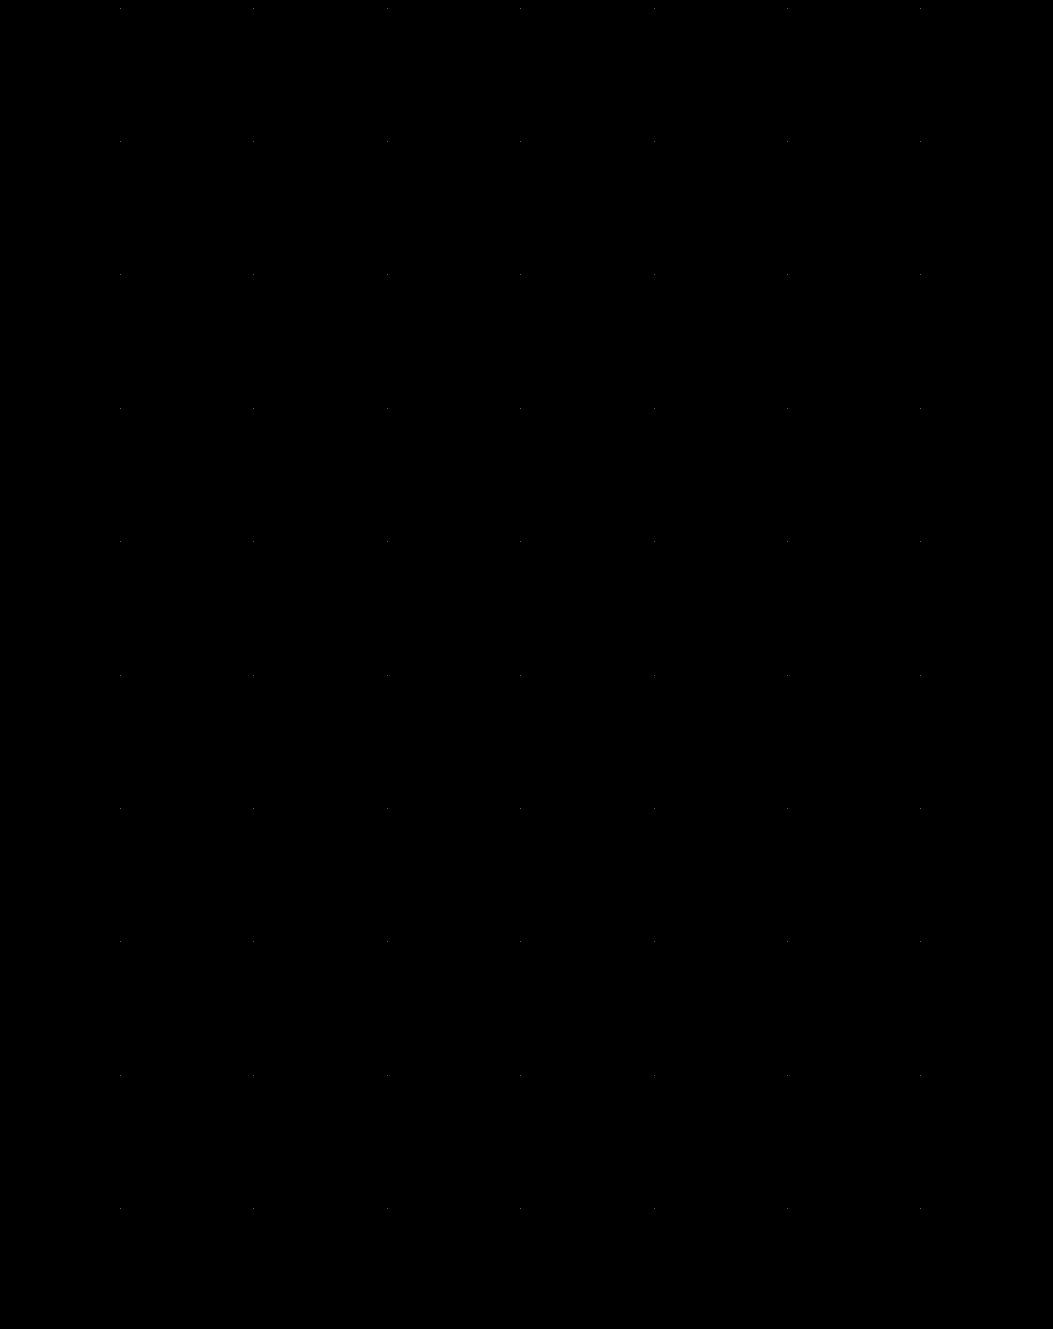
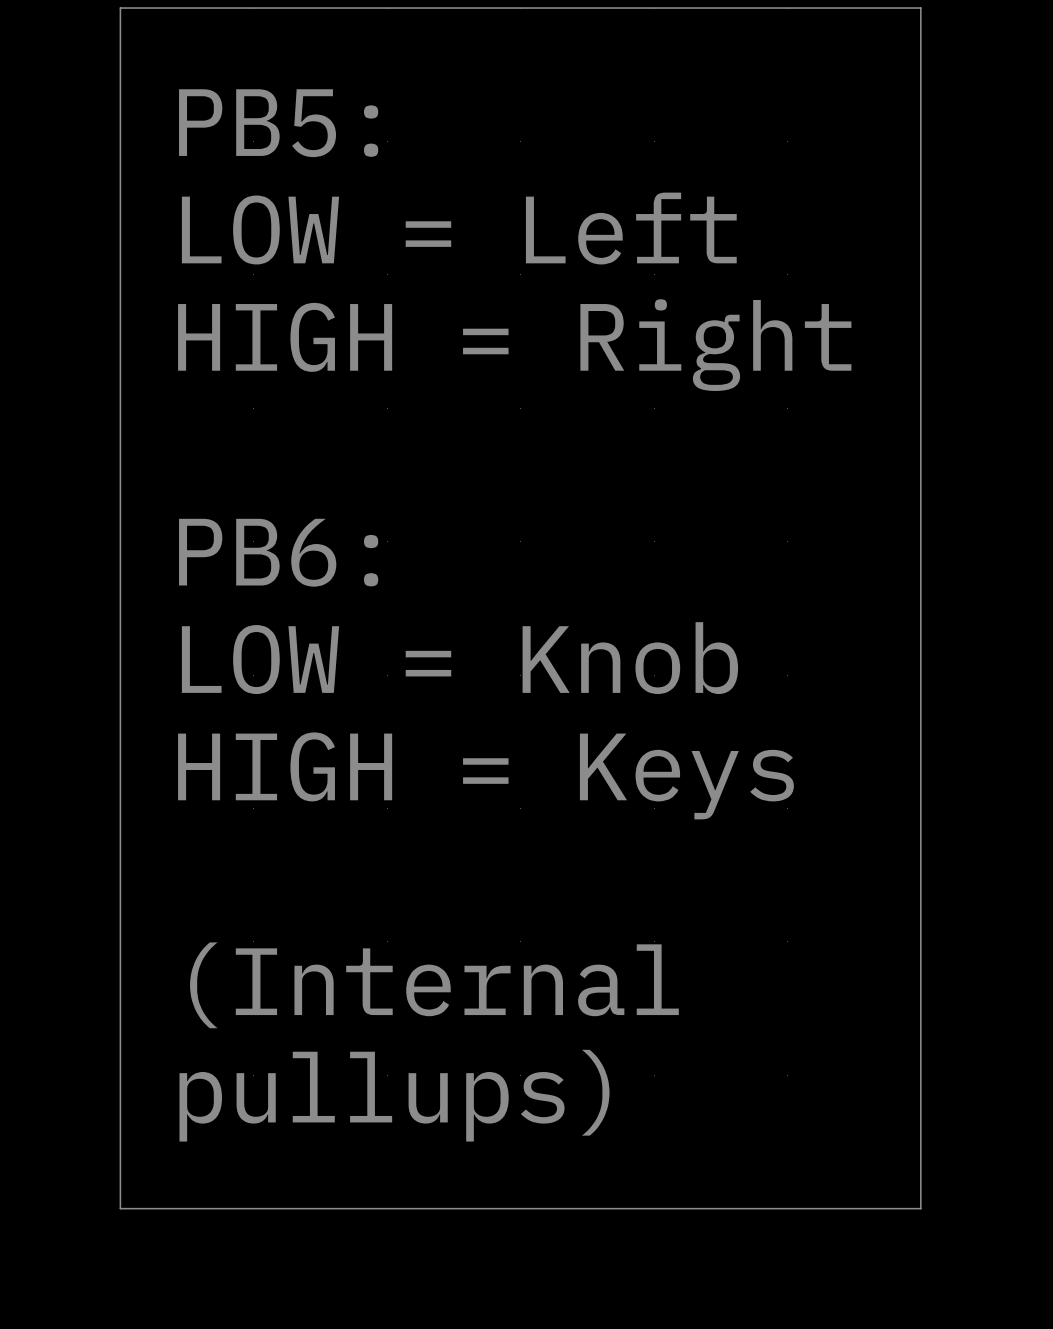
line: none -> (120, 8) (920, 8) (920, 1208) (120, 1208) (120, 8)
text: none -> PB5: (278, 123)
text: none -> LOW = Left (459, 228)
text: none -> HIGH = Right (514, 345)
text: none -> PB6: (278, 552)
text: none -> LOW = Knob (459, 658)
text: none -> HIGH = Keys (485, 775)
text: none -> (Internal (434, 985)
text: none -> pullups) (394, 1095)

